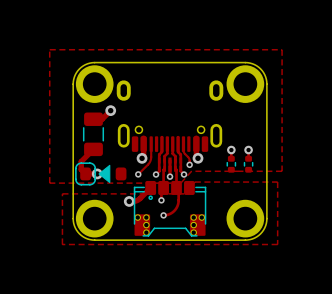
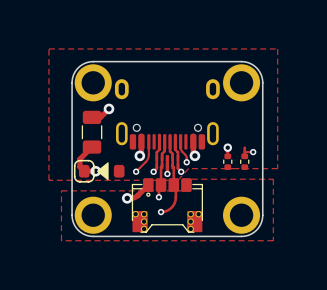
via: (248, 150) -> none
track: none -> (244, 152) (253, 152)
via: none -> (253, 152)

